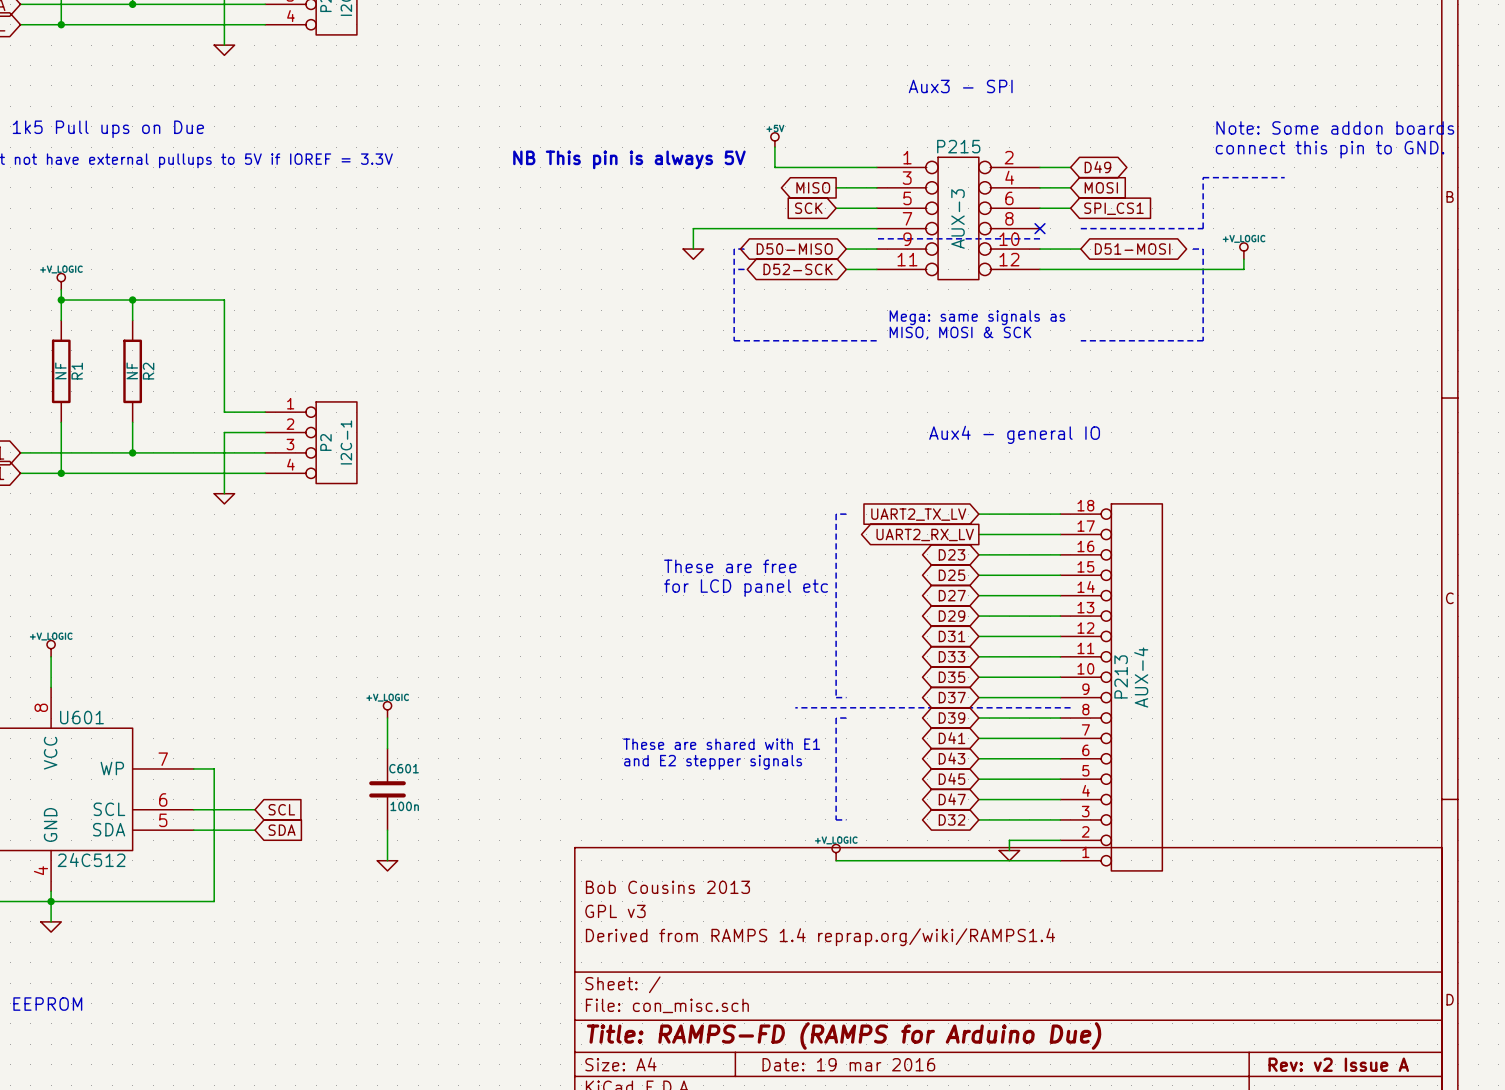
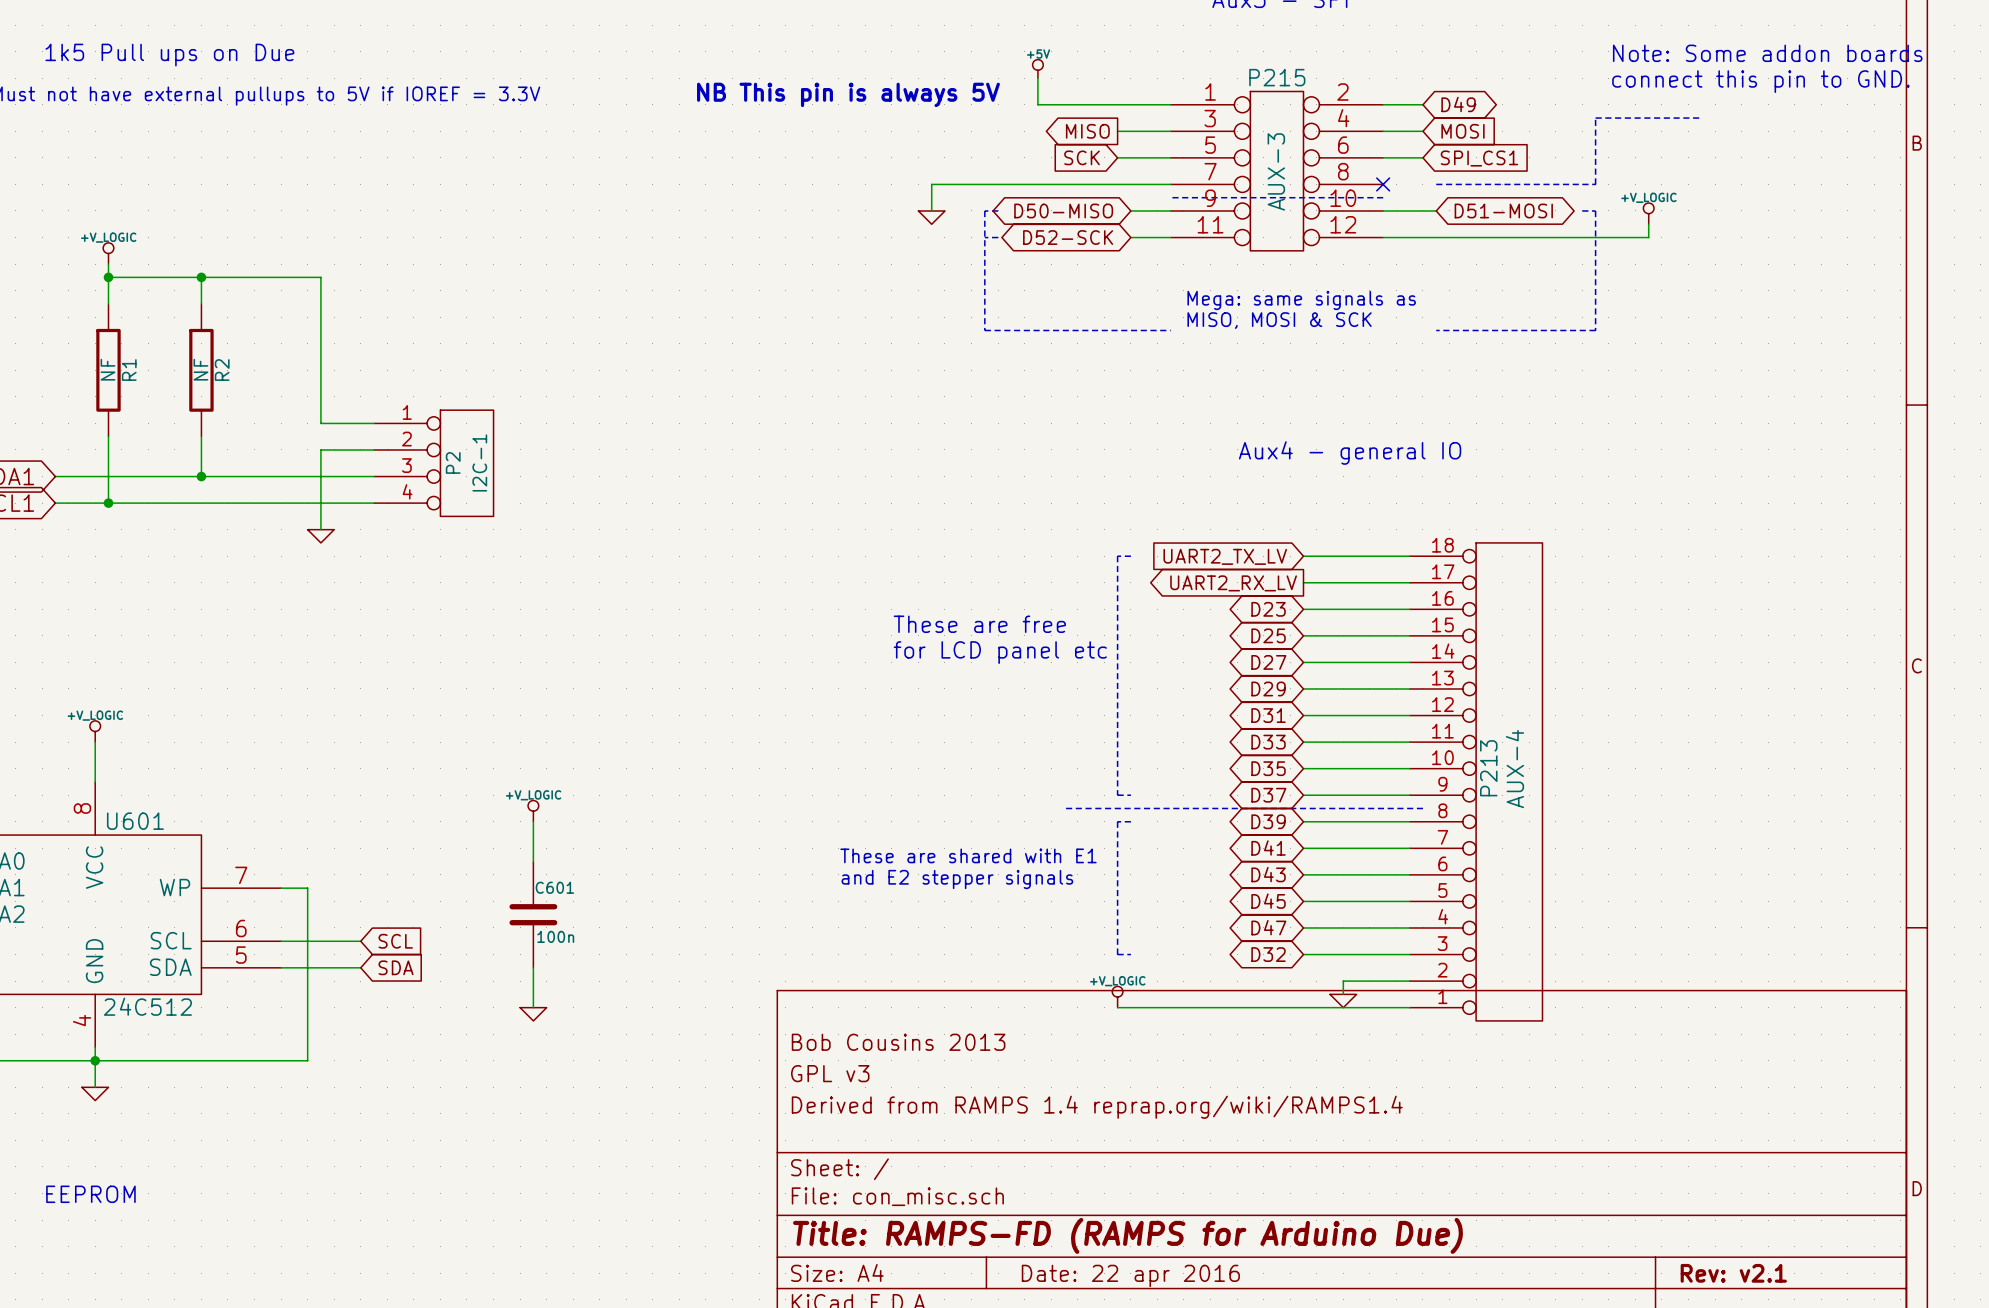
title block: Date: 19 mar 2016 (848, 1064) -> Date: 22 apr 2016 (1130, 1275)
title block: Rev: v2 Issue A (1338, 1064) -> Rev: v2.1 (1733, 1273)

